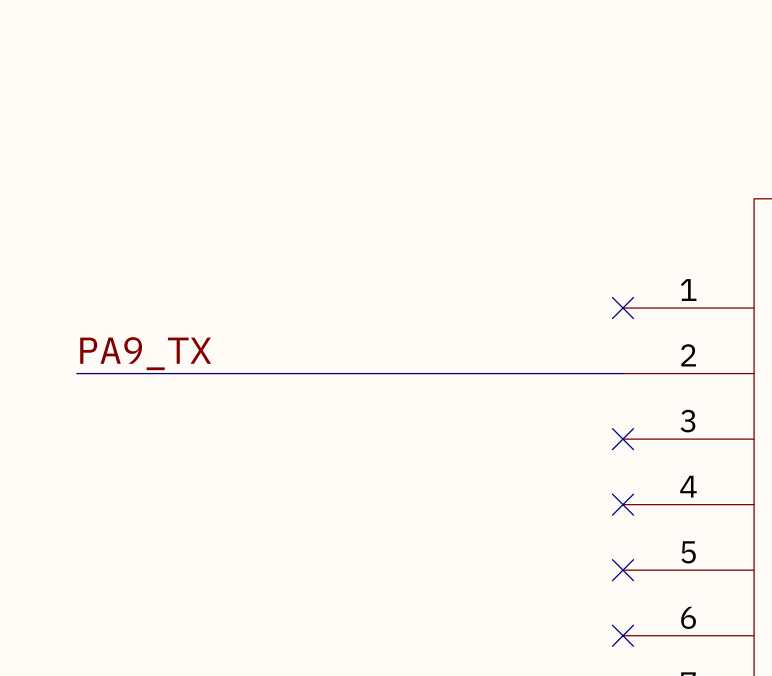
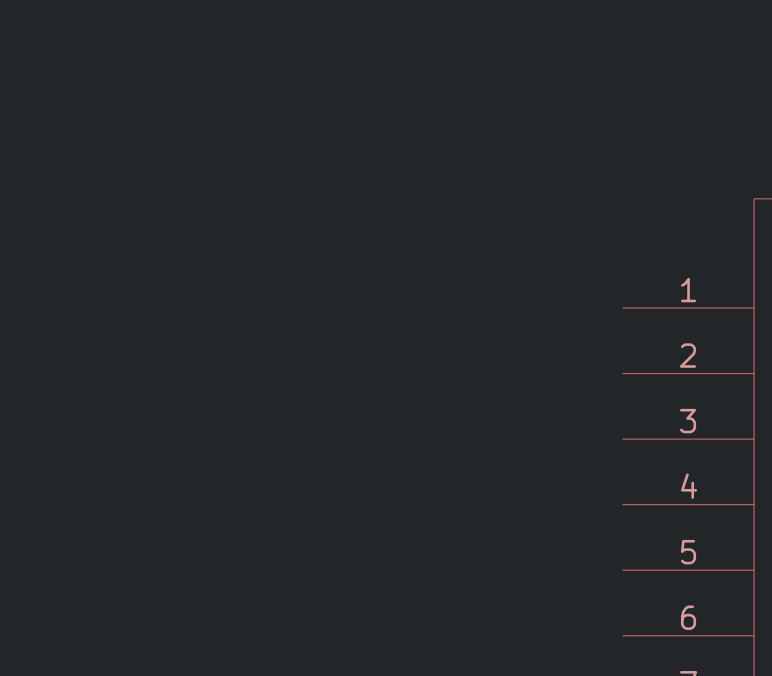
no-connect mark: (622, 308) -> none
label: PA9_TX (145, 353) -> none
wire: (76, 373) (622, 373) -> none
no-connect mark: (622, 439) -> none
no-connect mark: (622, 504) -> none
no-connect mark: (622, 570) -> none
no-connect mark: (622, 635) -> none

